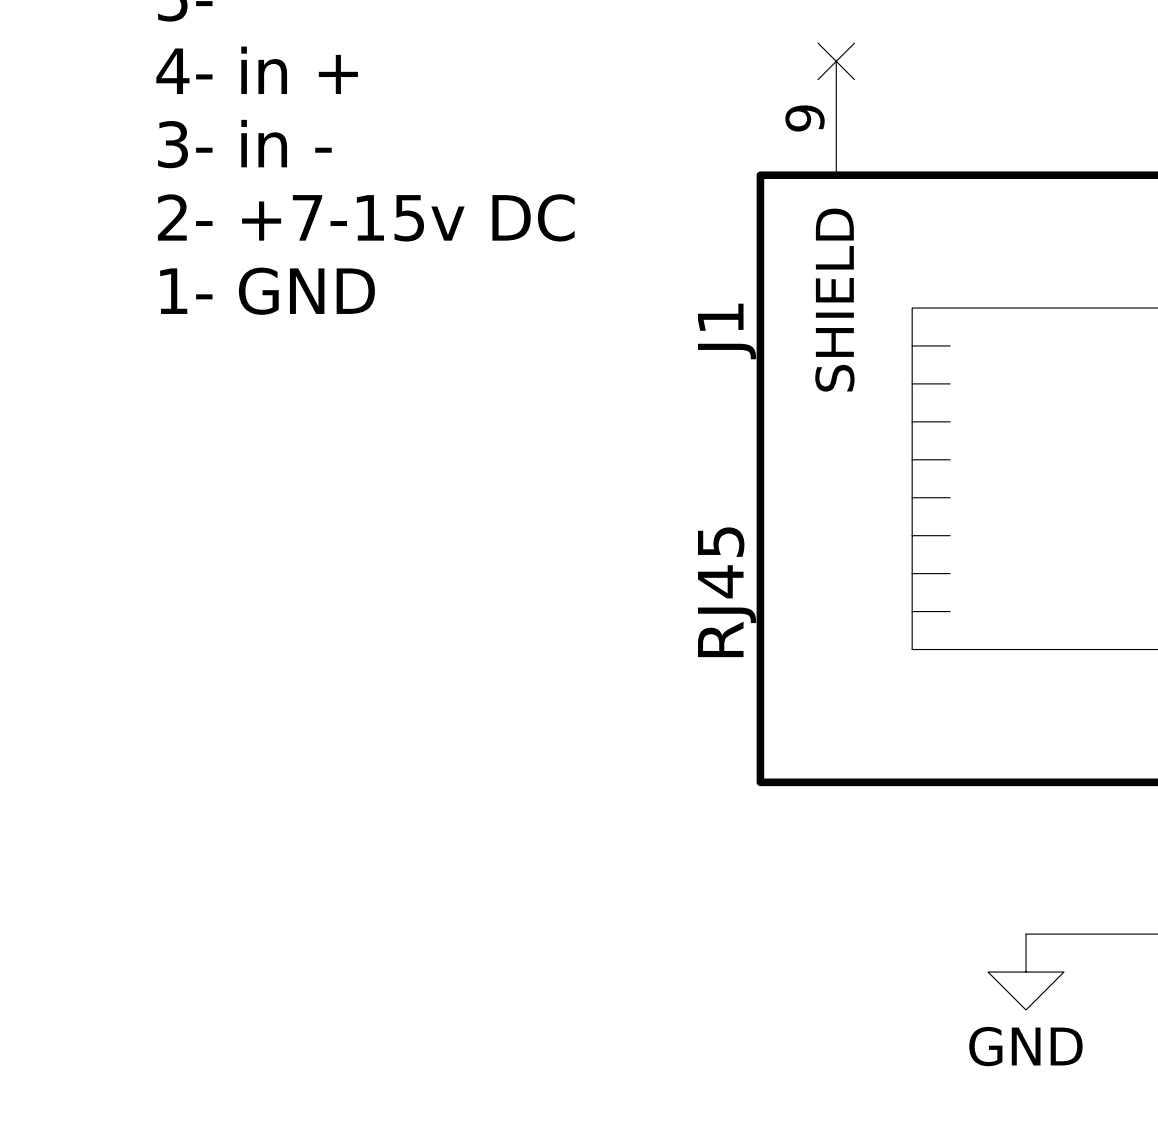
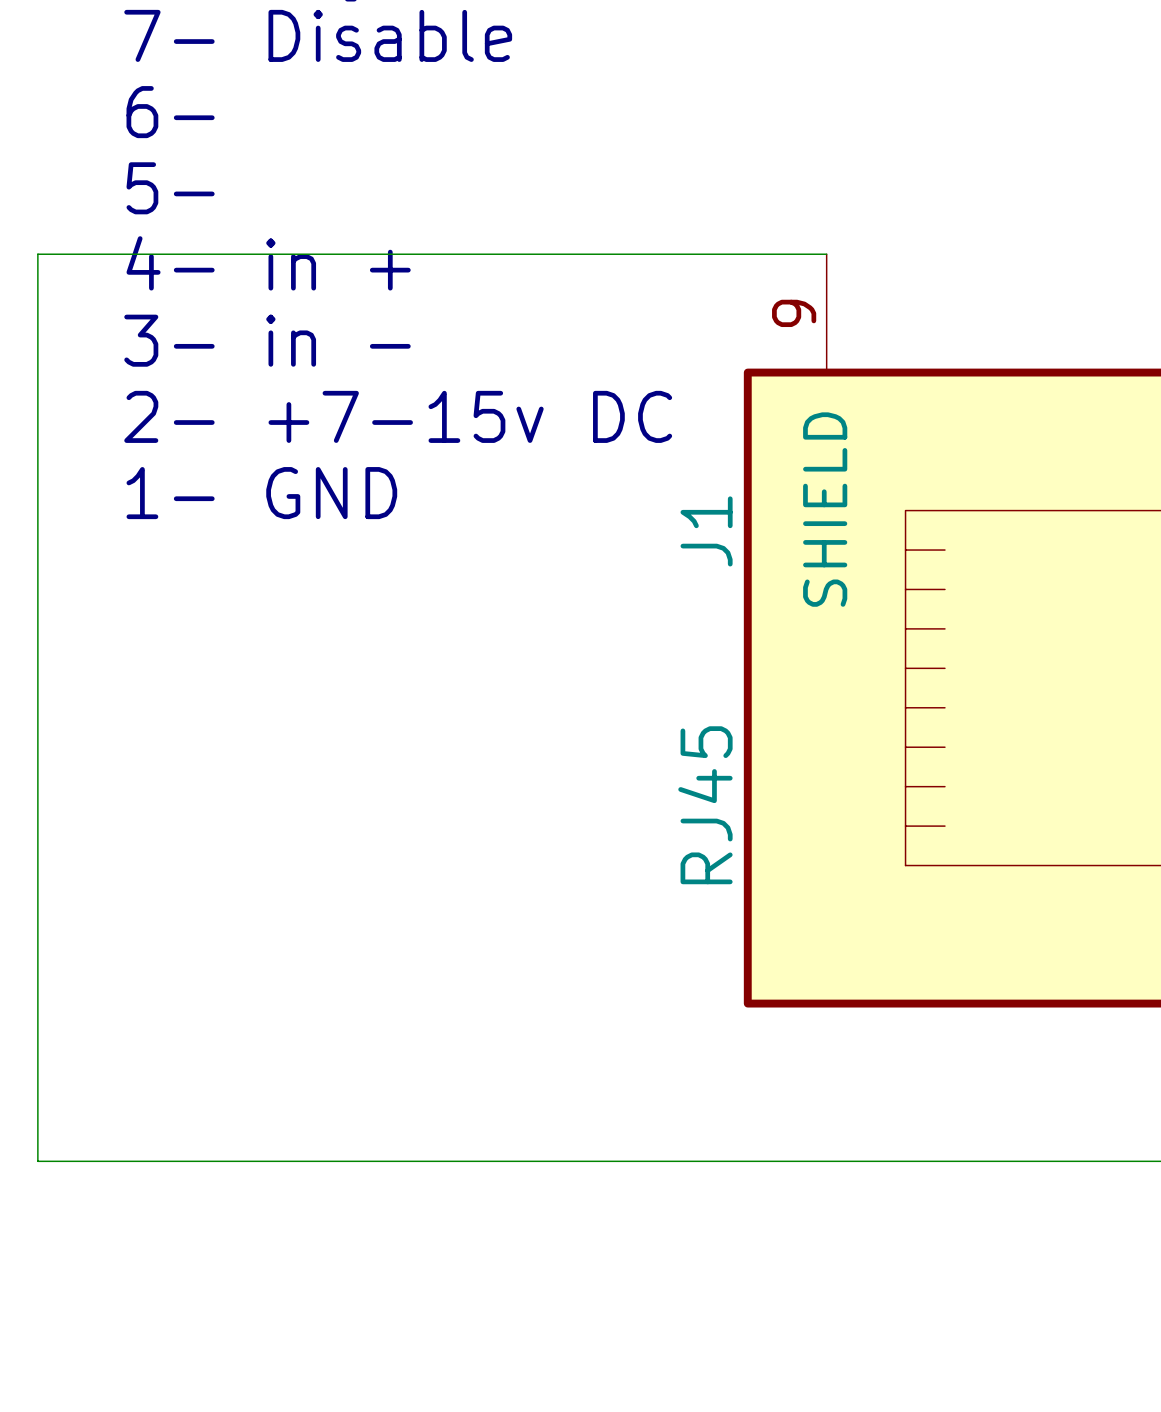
wire: none -> (826, 254) (37, 254) (37, 1161) (1023, 1161)
no-connect mark: (836, 61) -> none
power symbol: GND (1026, 972) -> none

